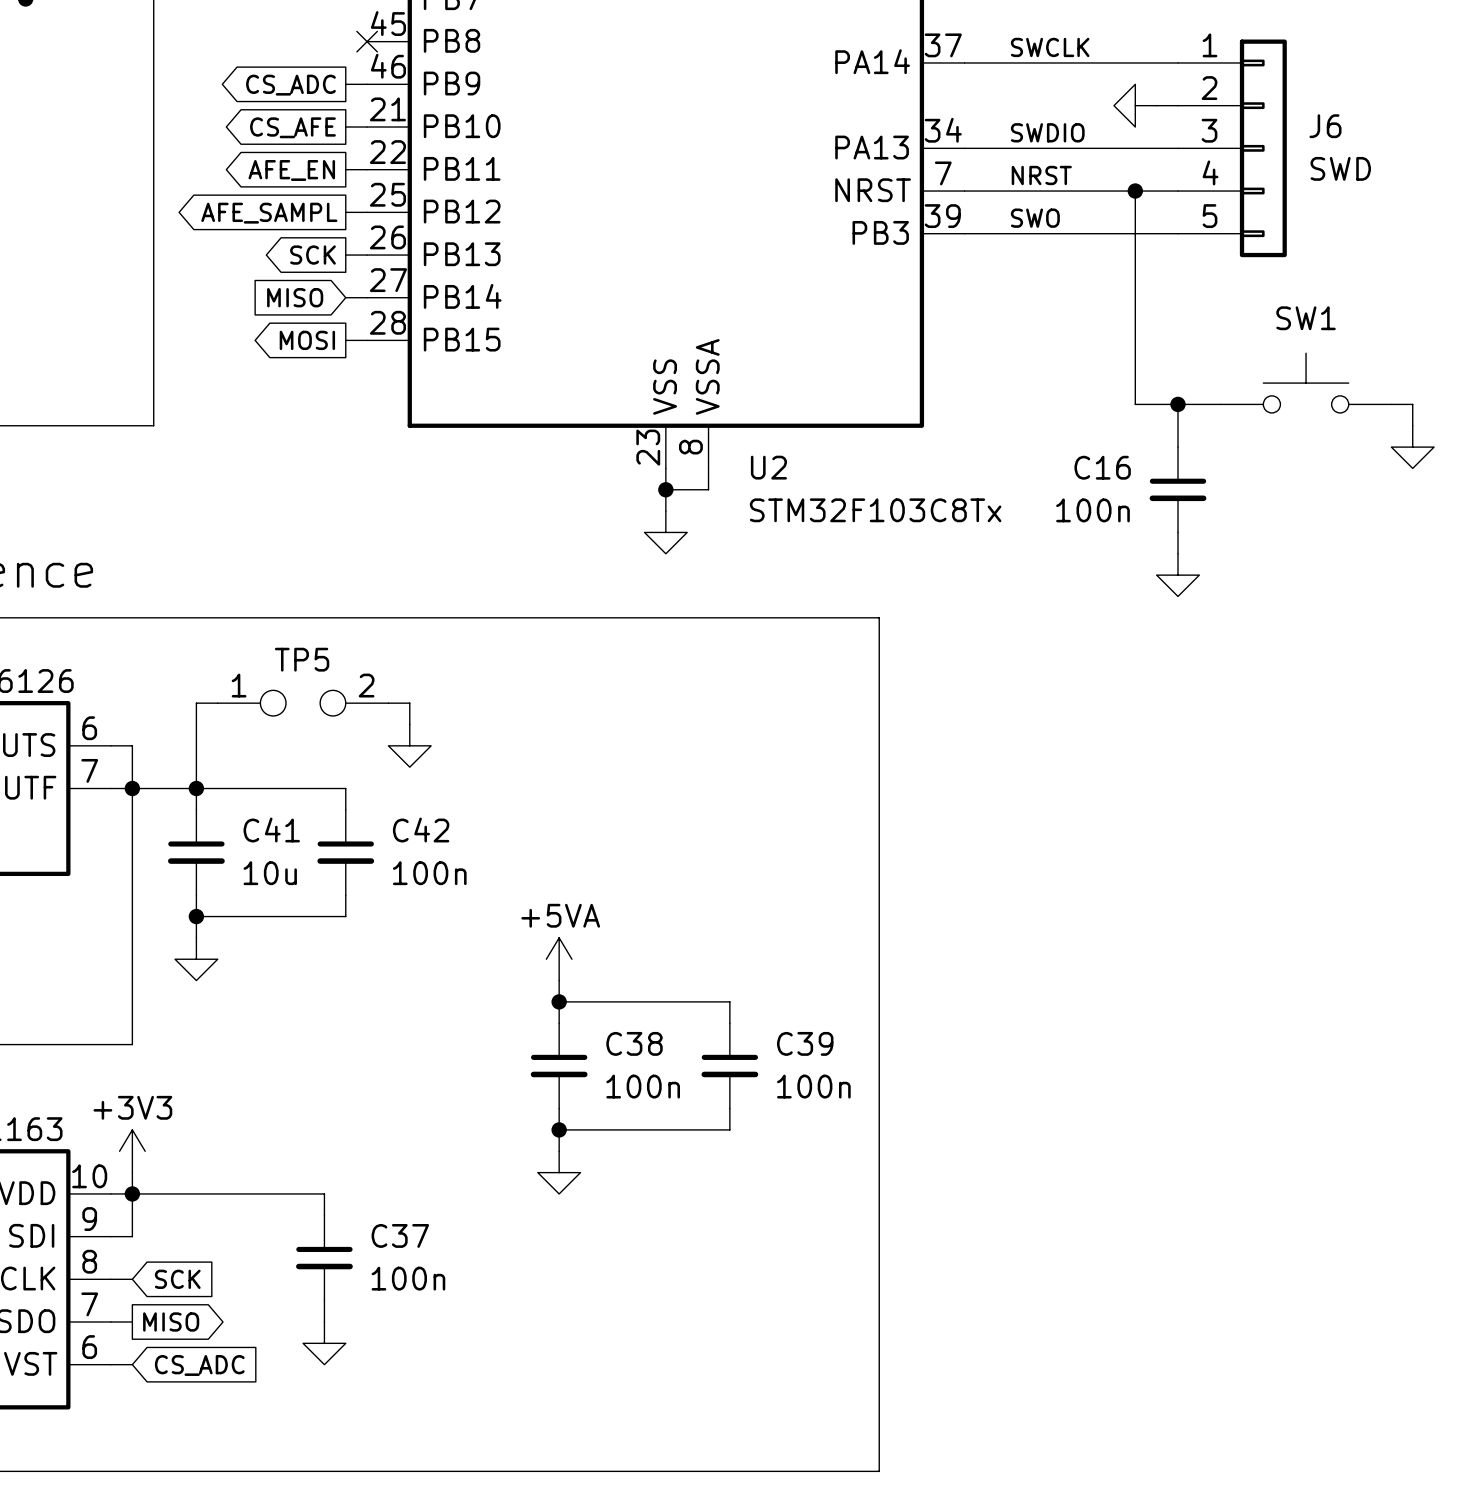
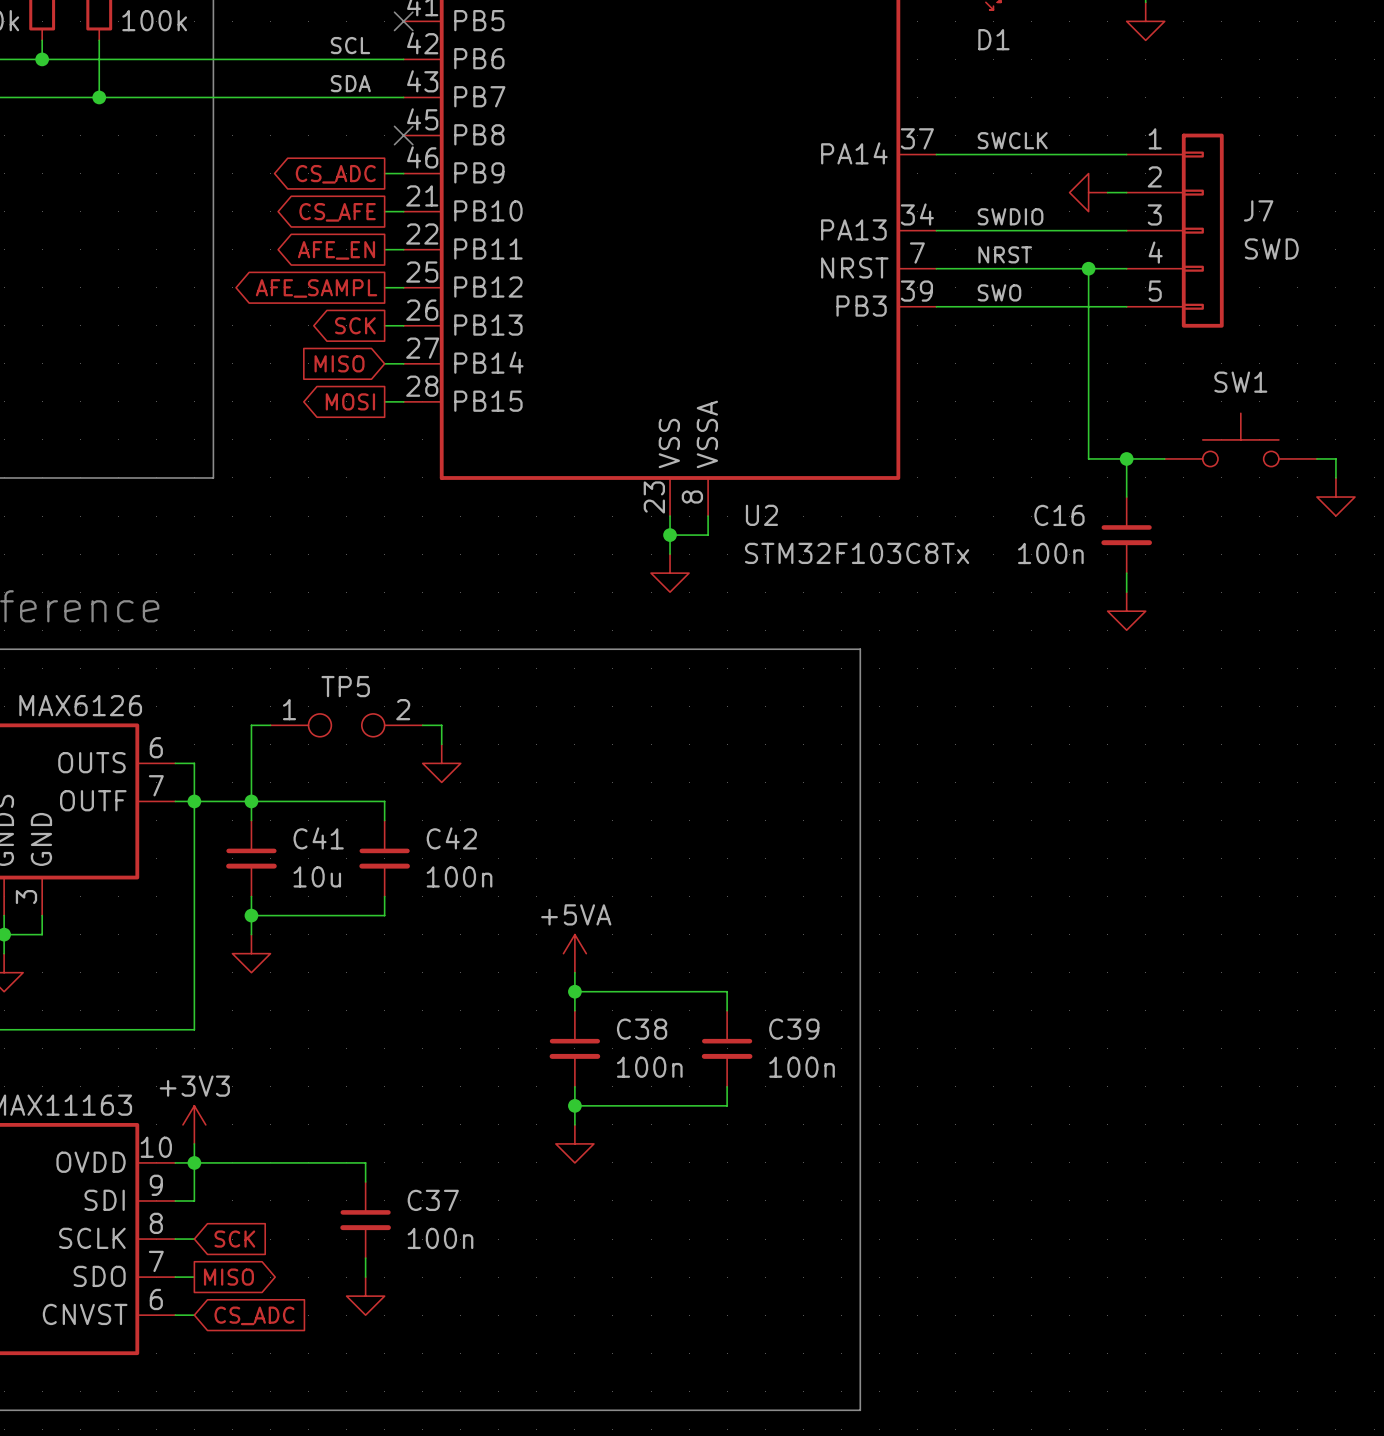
J6 name: J6 (1325, 126) -> J7 (1258, 210)

